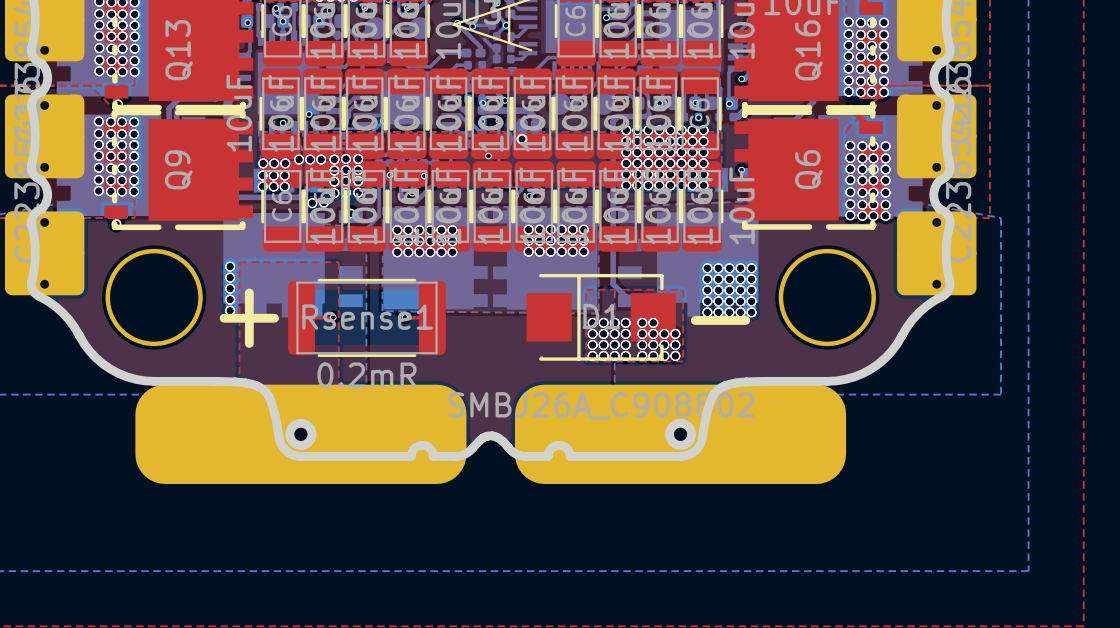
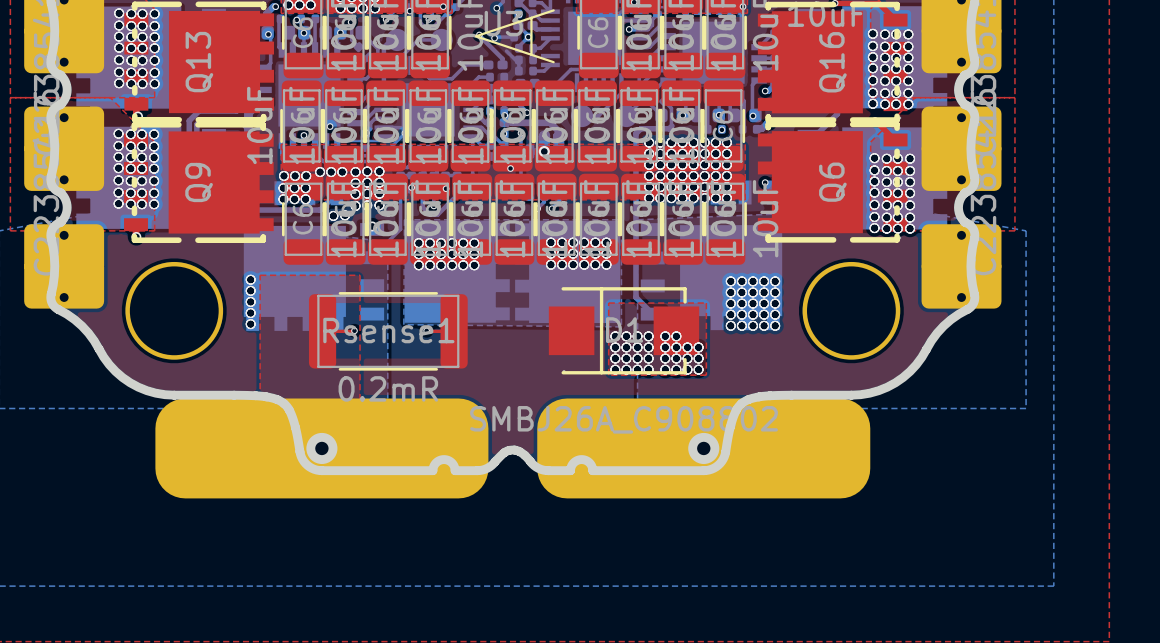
text: + (249, 318) -> none
text: - (720, 320) -> none

